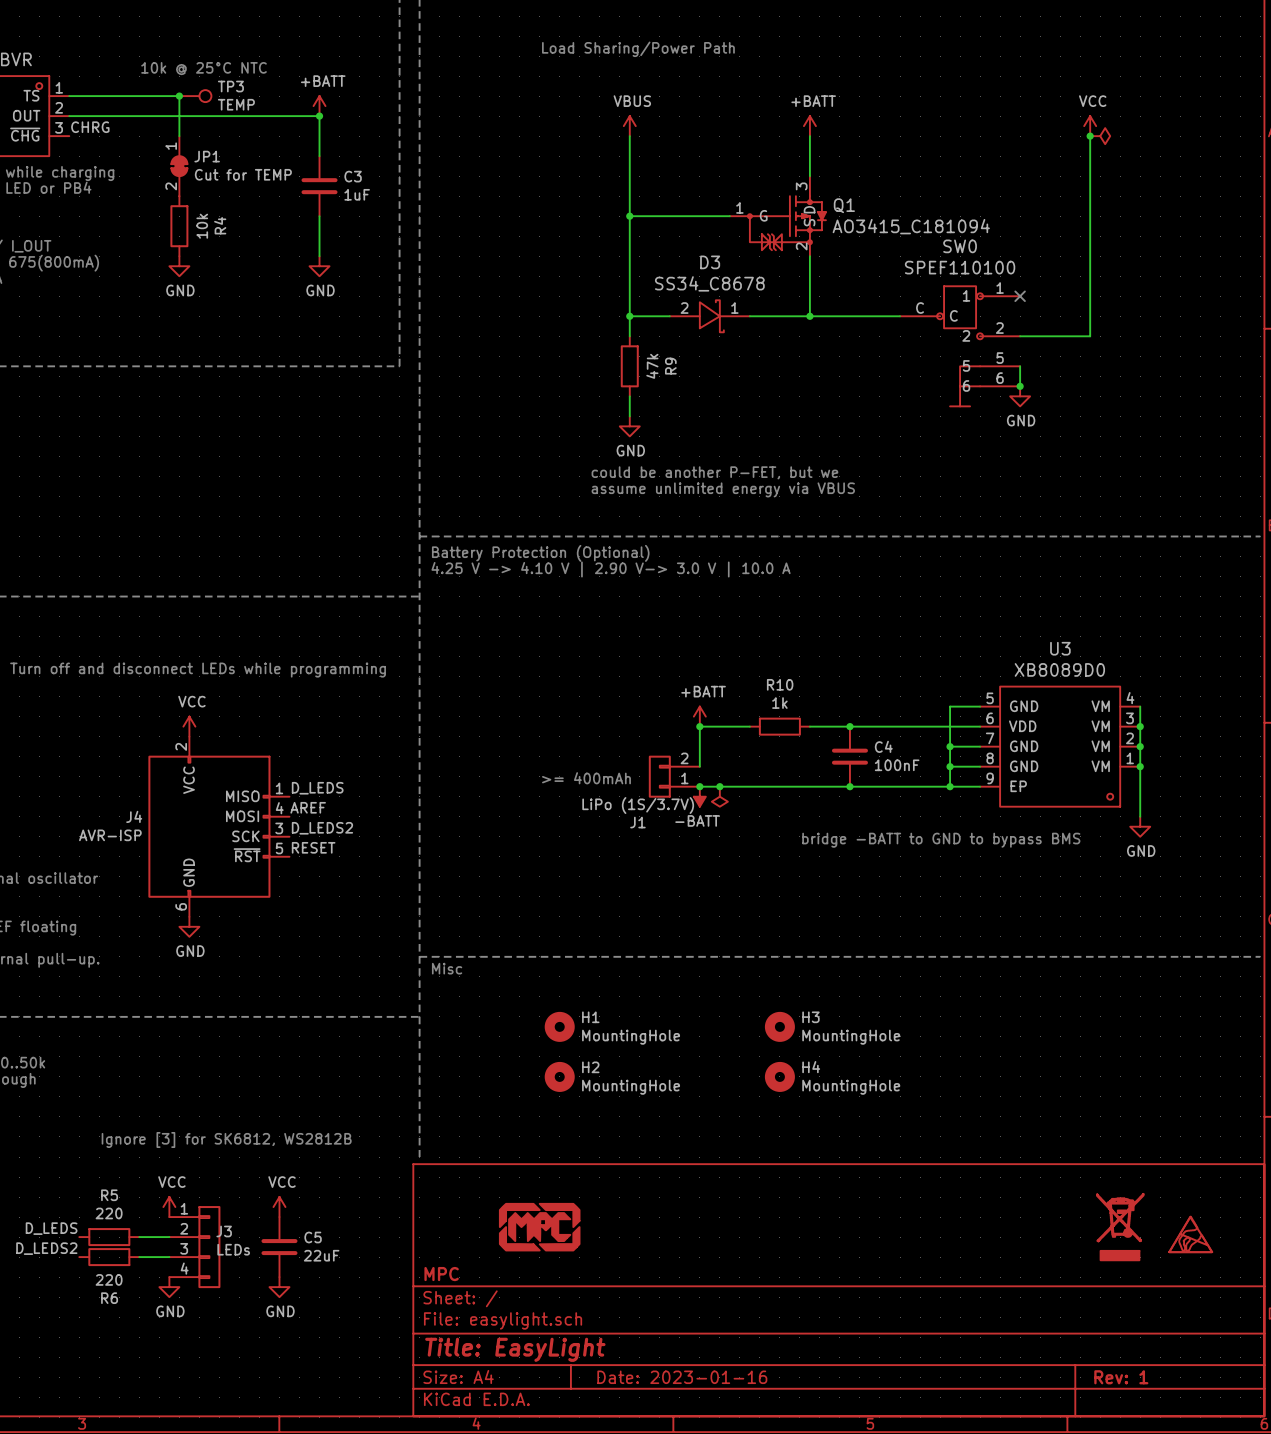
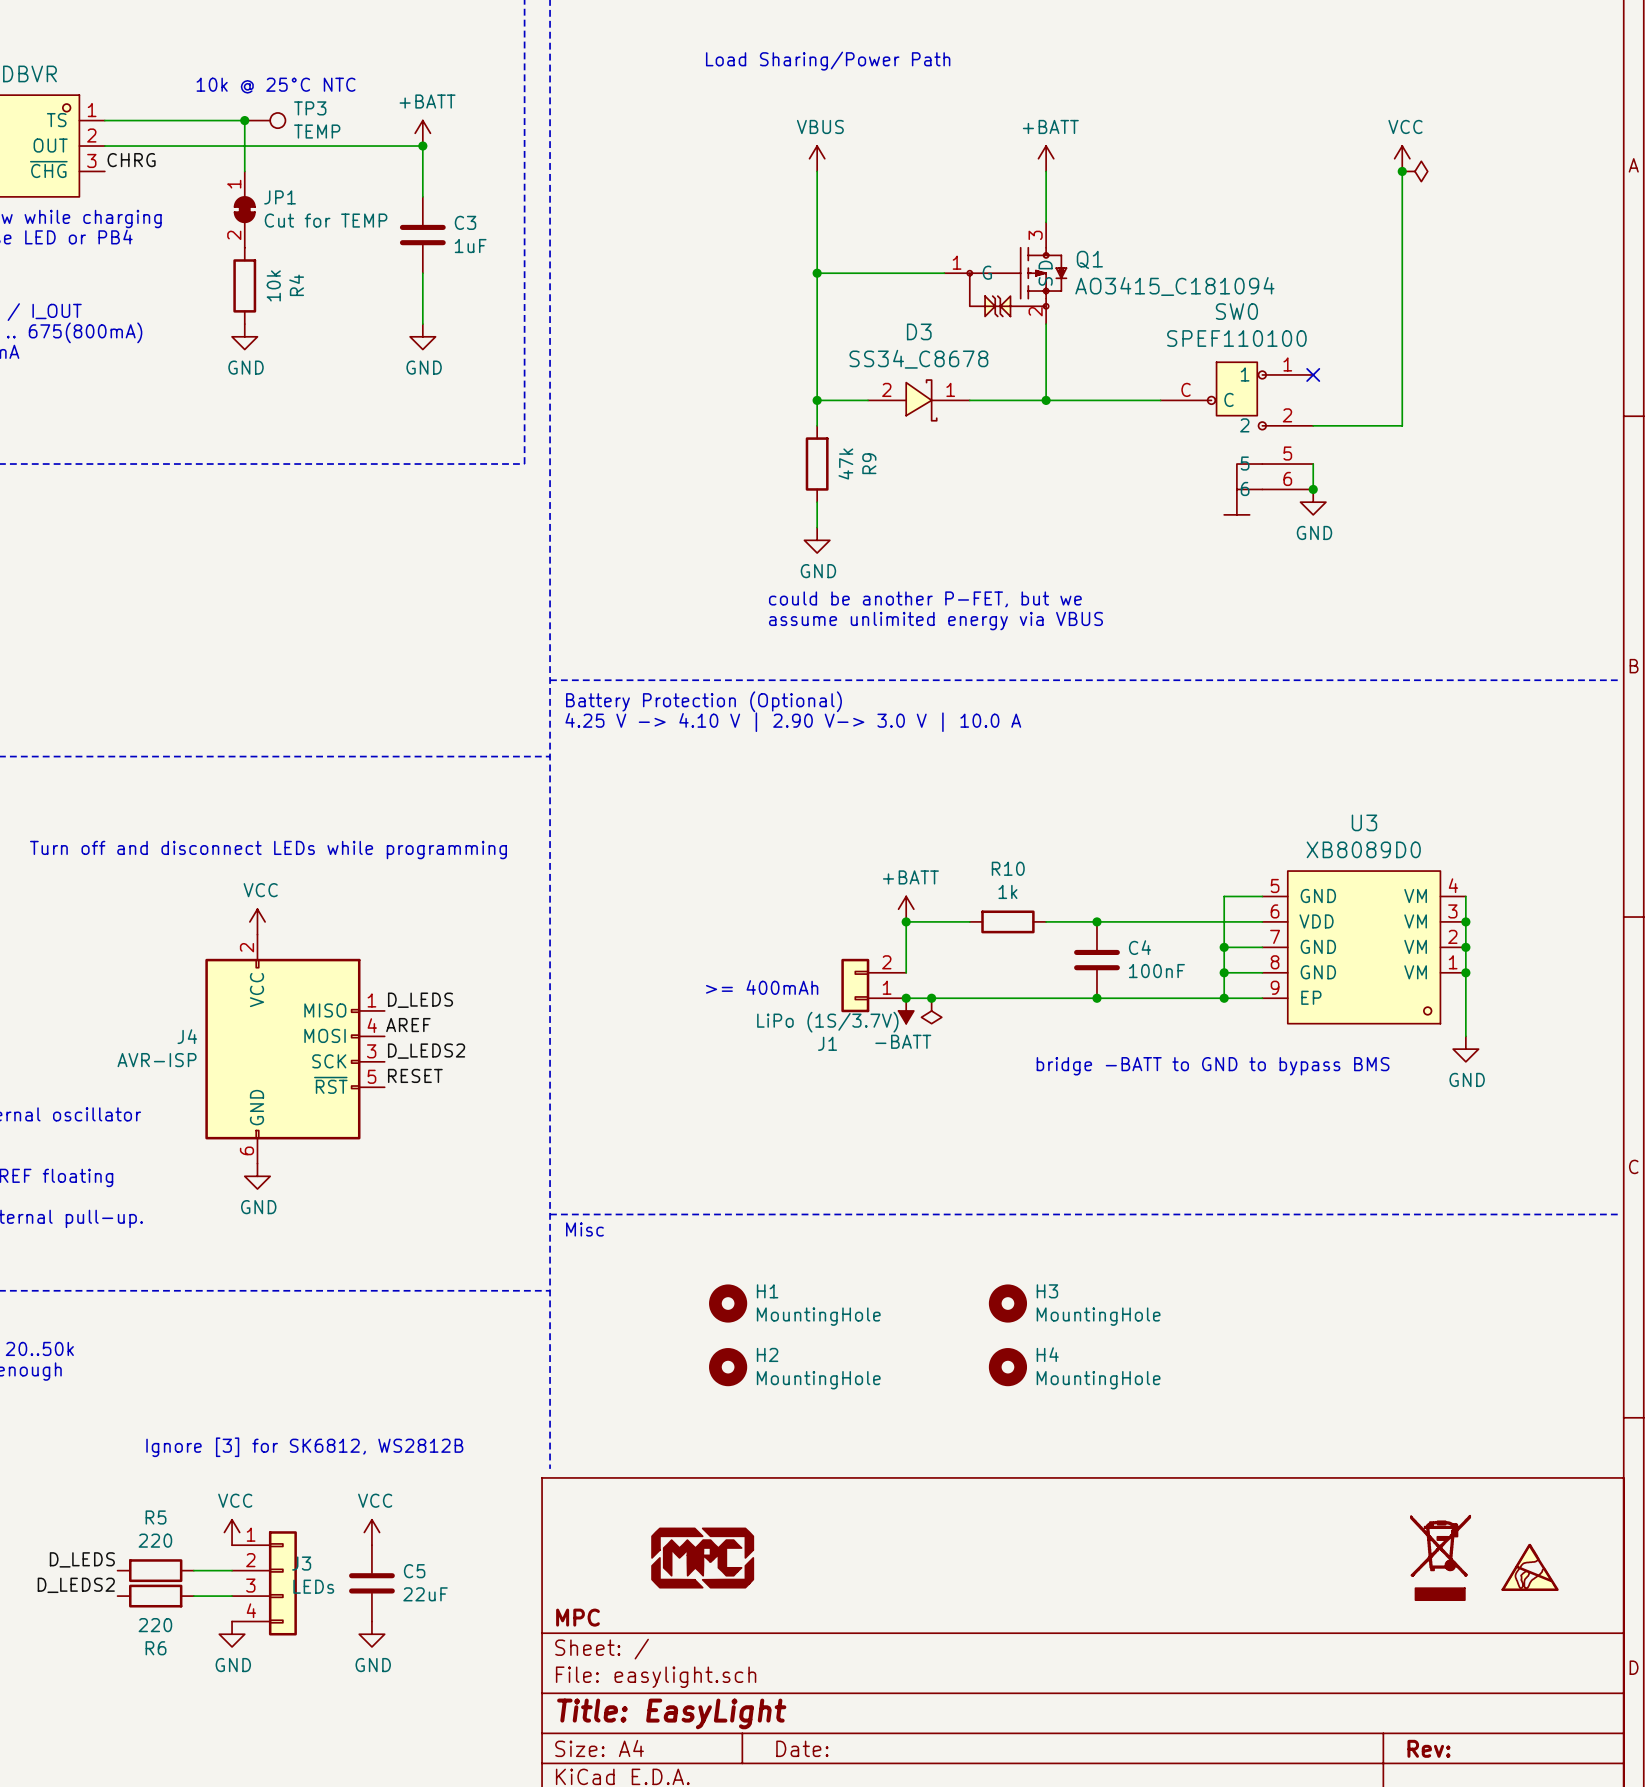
title block: Date: 2023-01-16 (682, 1377) -> Date: (802, 1748)
title block: Rev: 1 (1121, 1377) -> Rev: (1428, 1748)

